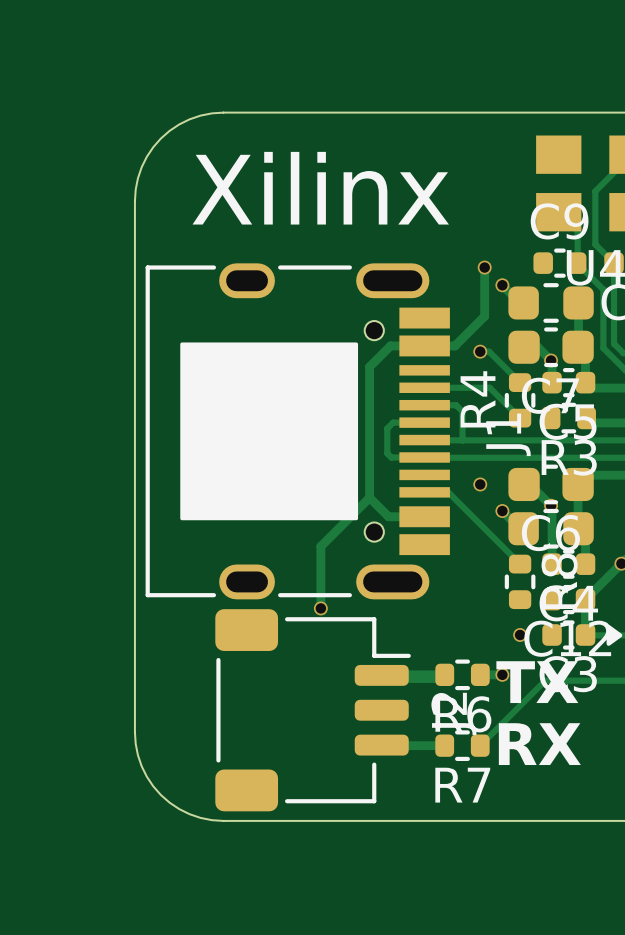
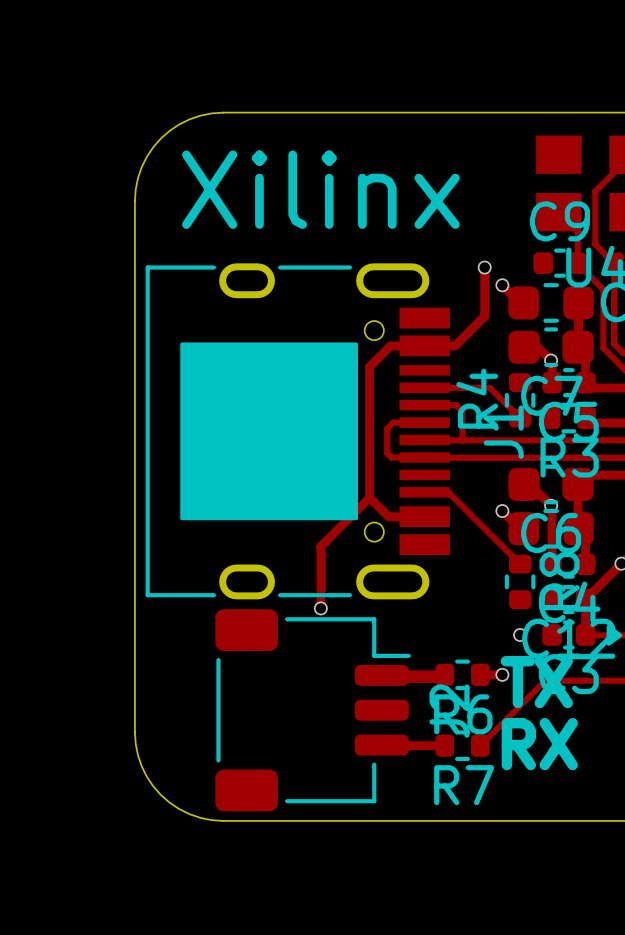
track: (480, 351) (489, 351) (520, 382) -> none
via: (480, 351) -> none
via: (480, 484) -> none

